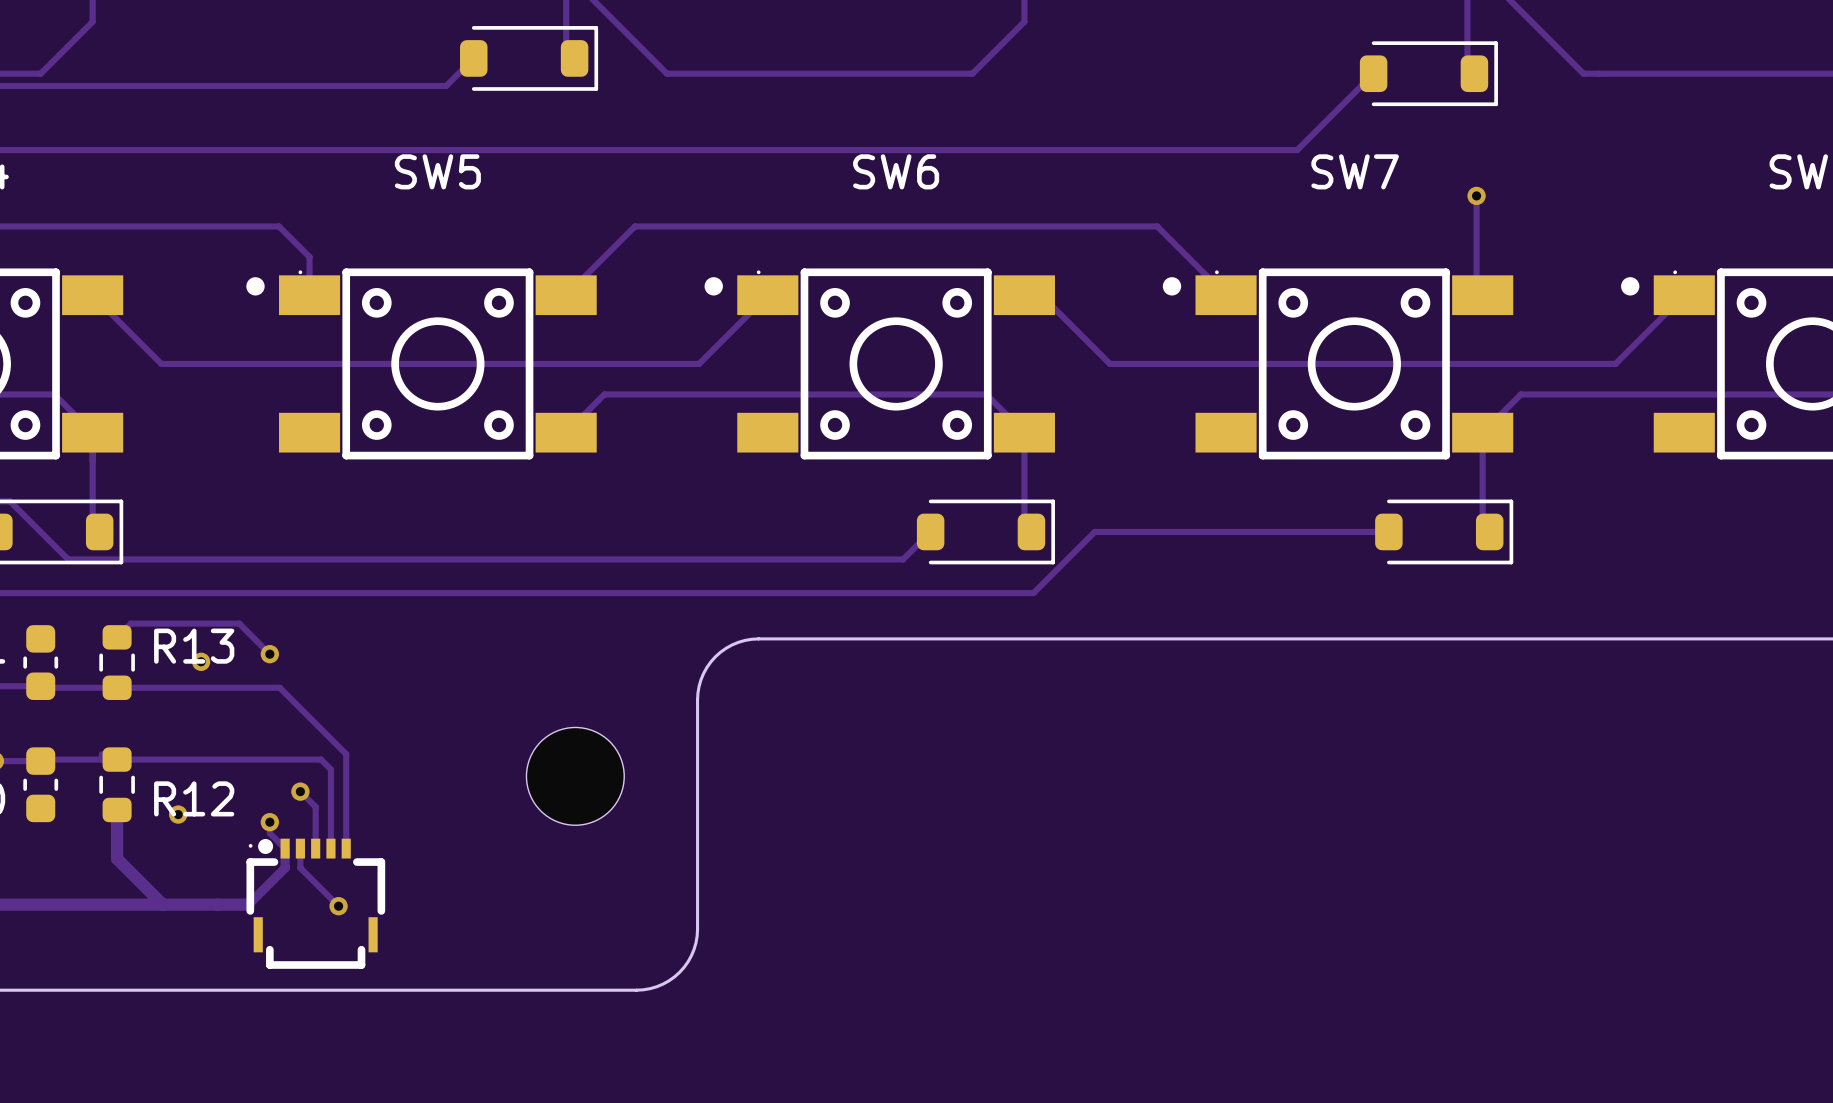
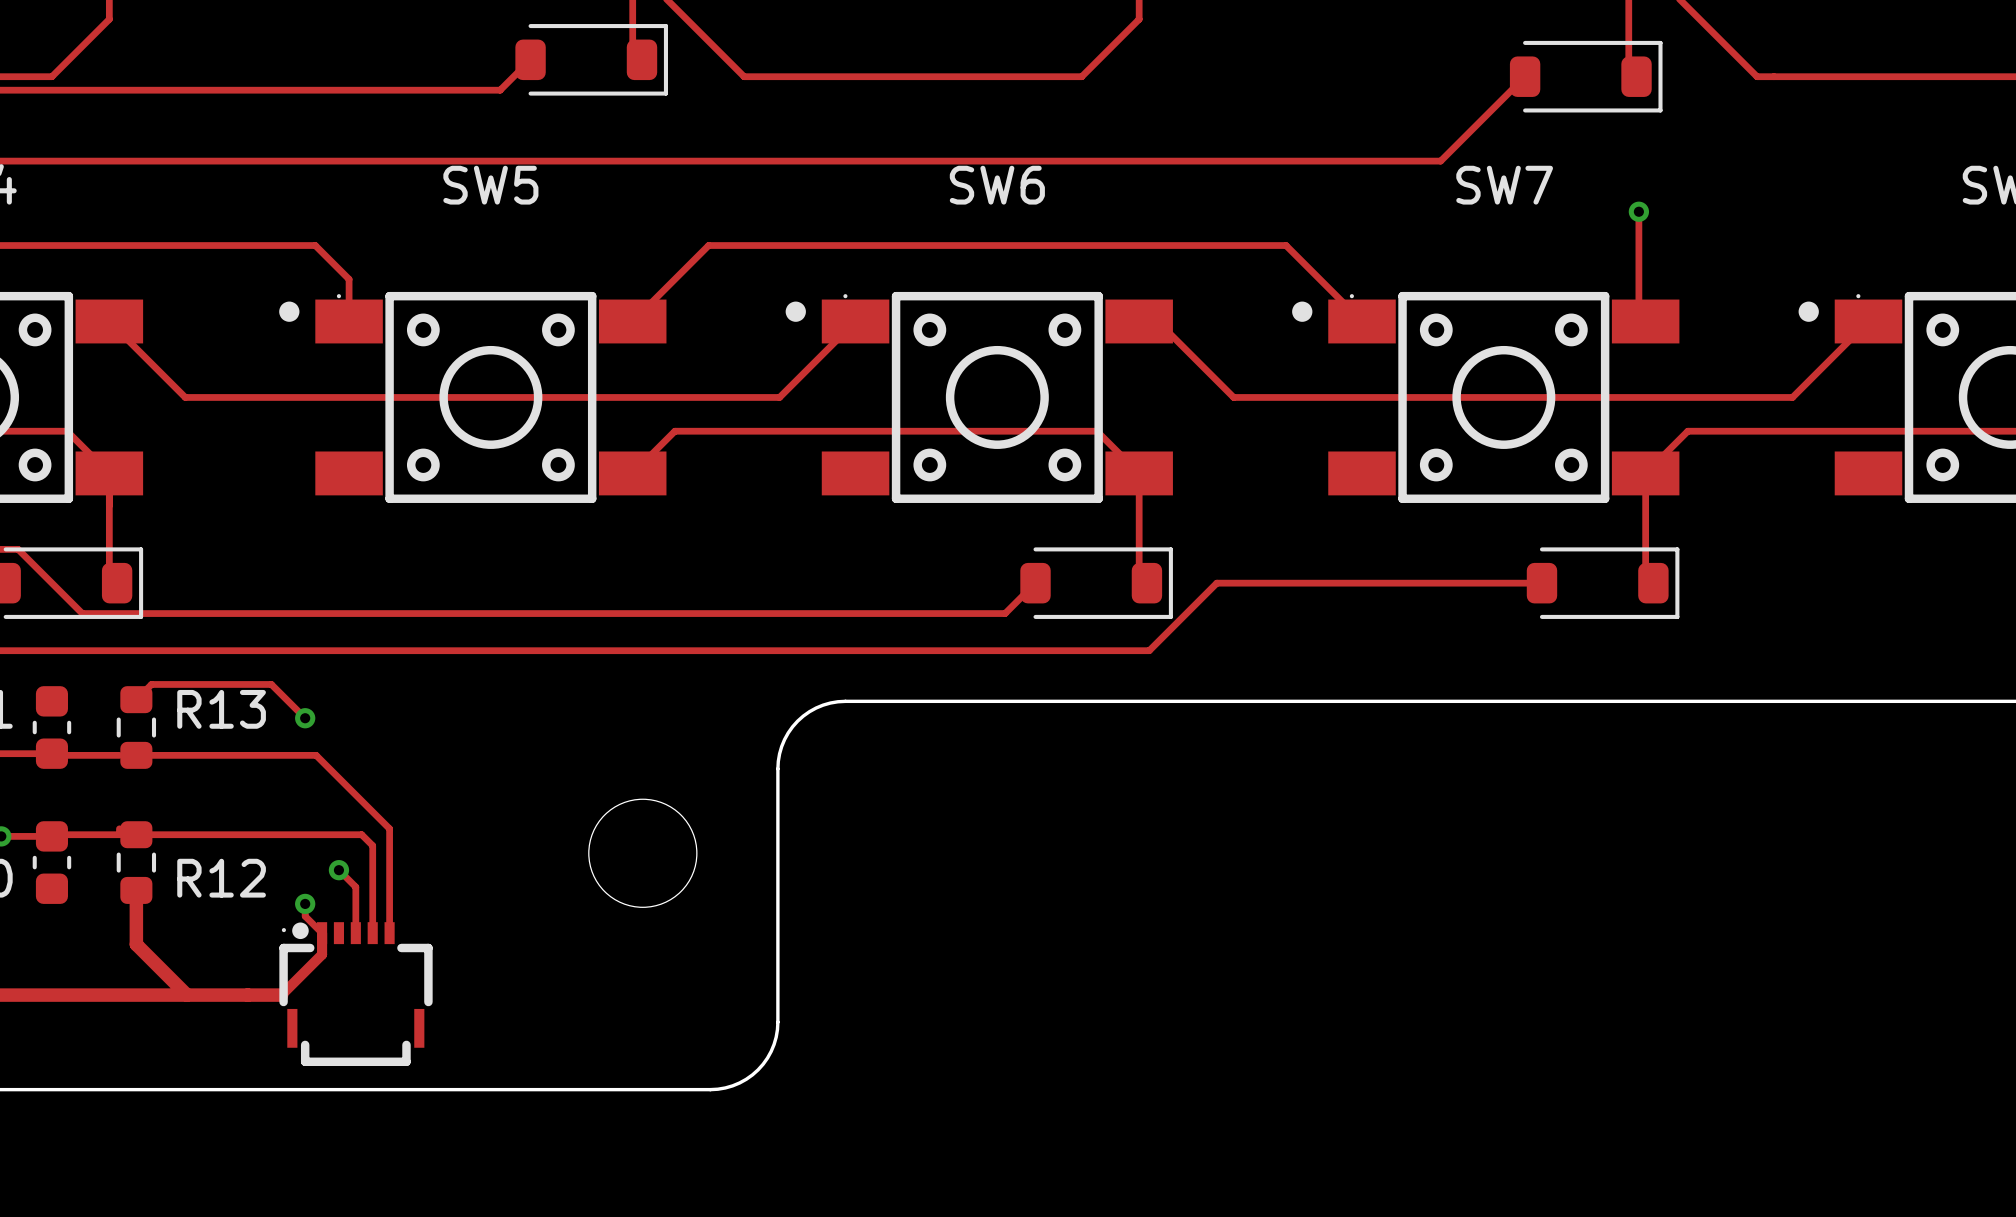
via: (201, 661) -> none
via: (178, 814) -> none
track: (300, 848) (300, 868) (338, 906) -> none
via: (338, 906) -> none

